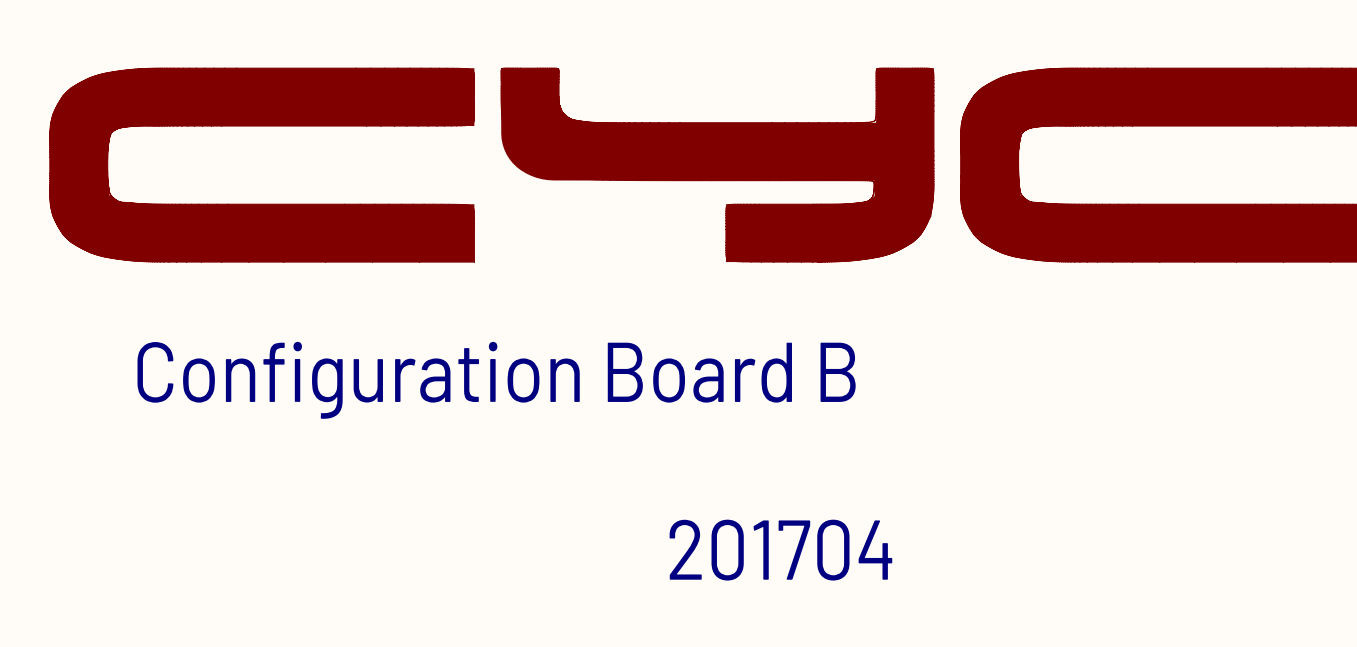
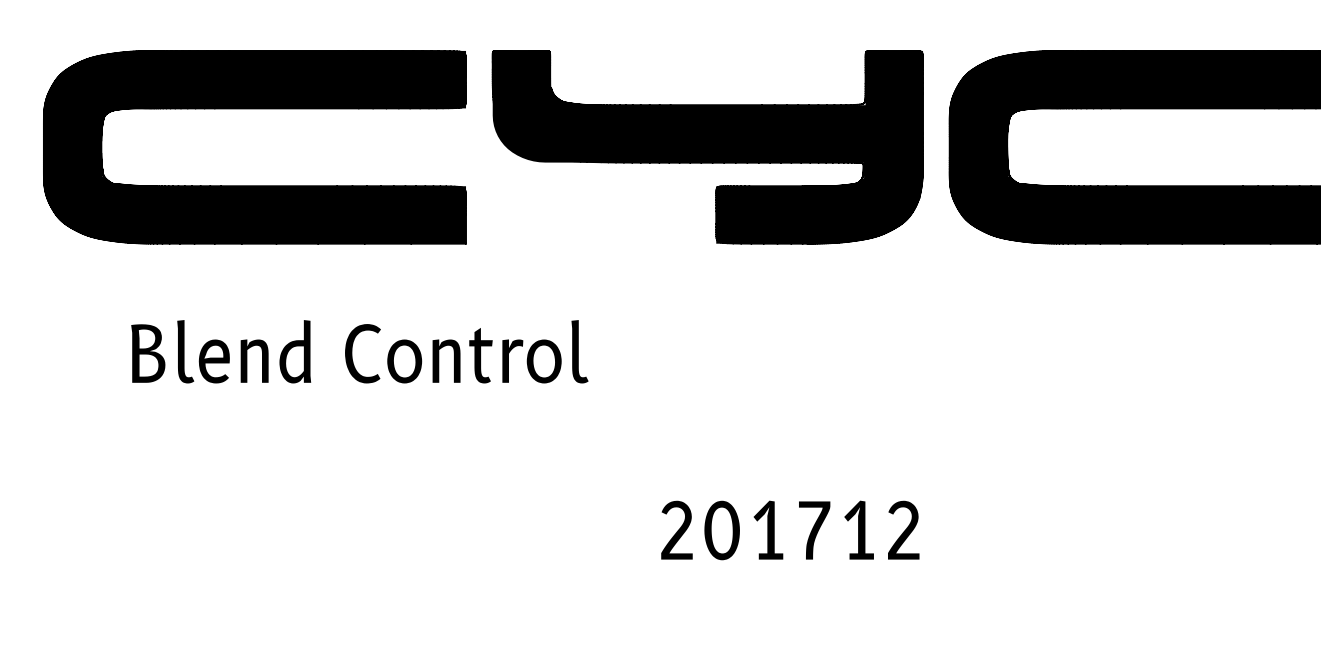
text: Configuration Board B (496, 380) -> Blend Control (359, 351)
text: 201704 (780, 550) -> 201712 (790, 530)

